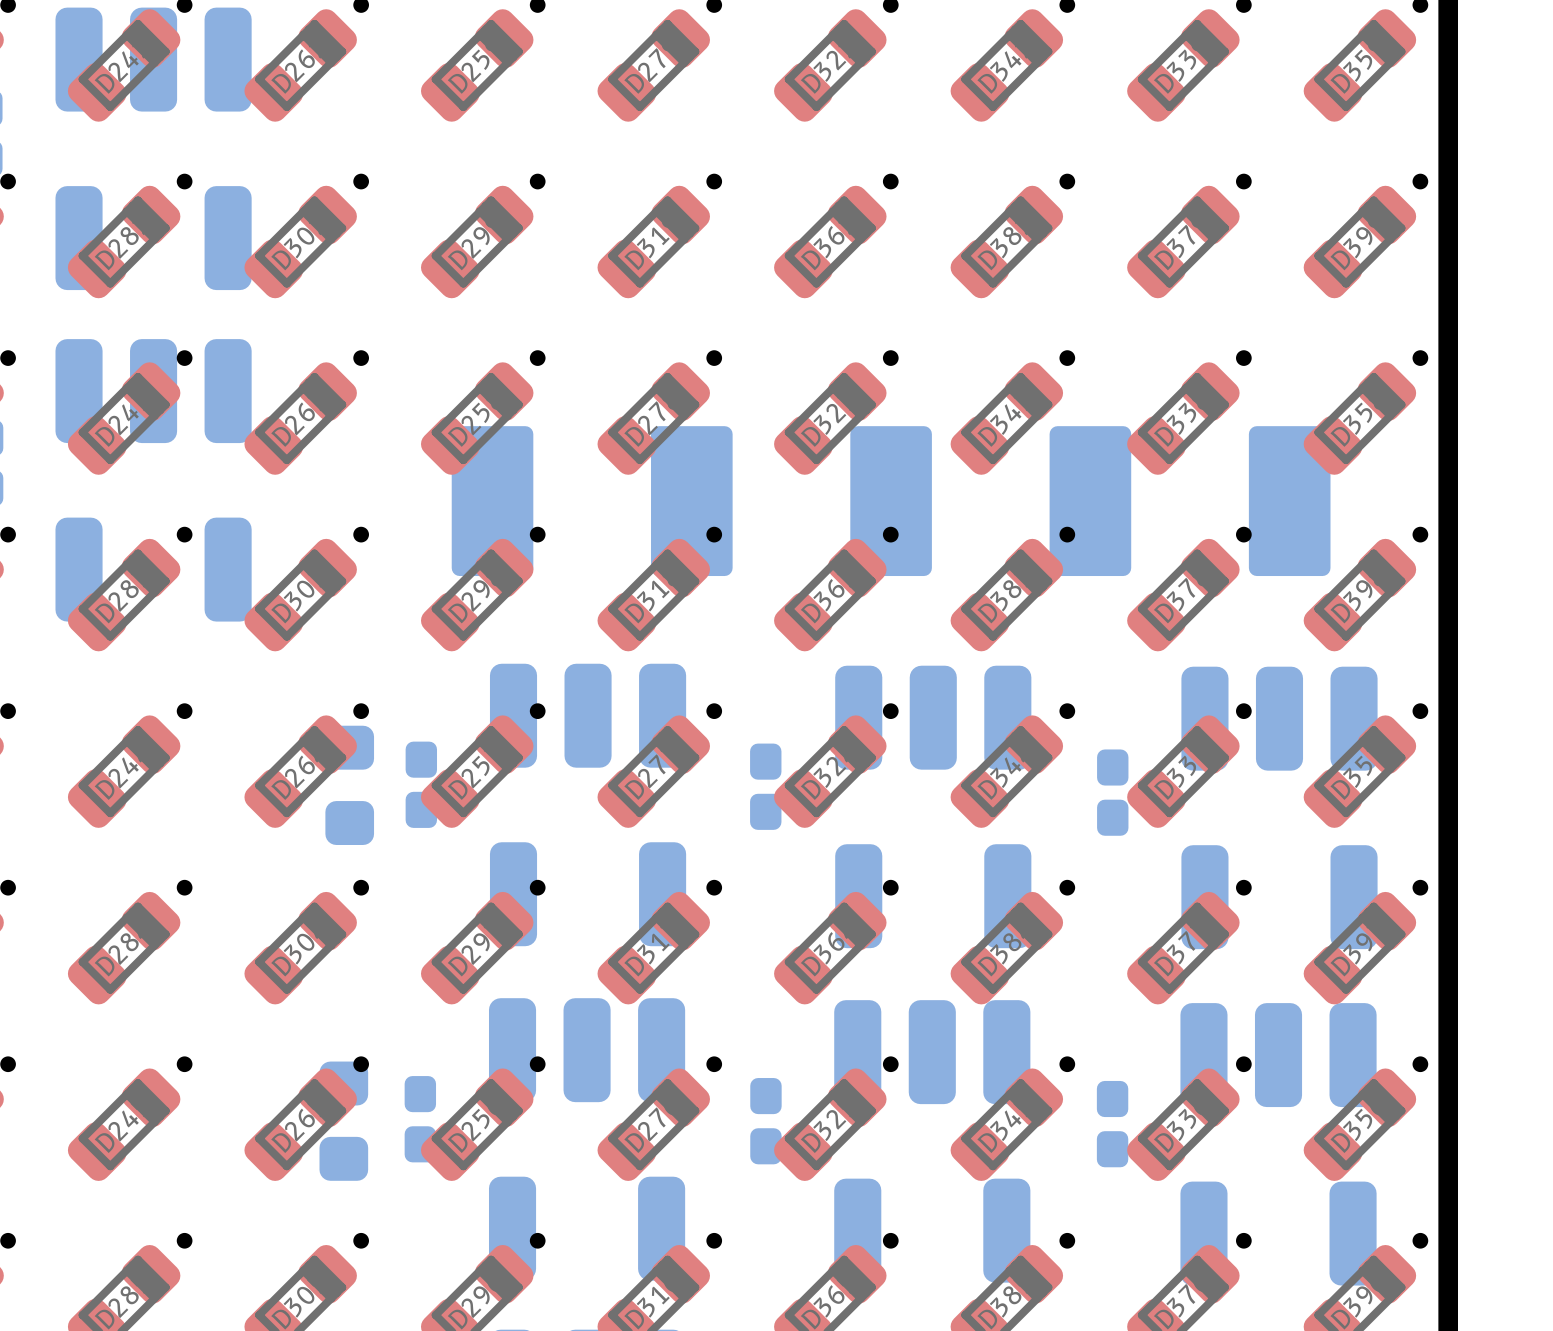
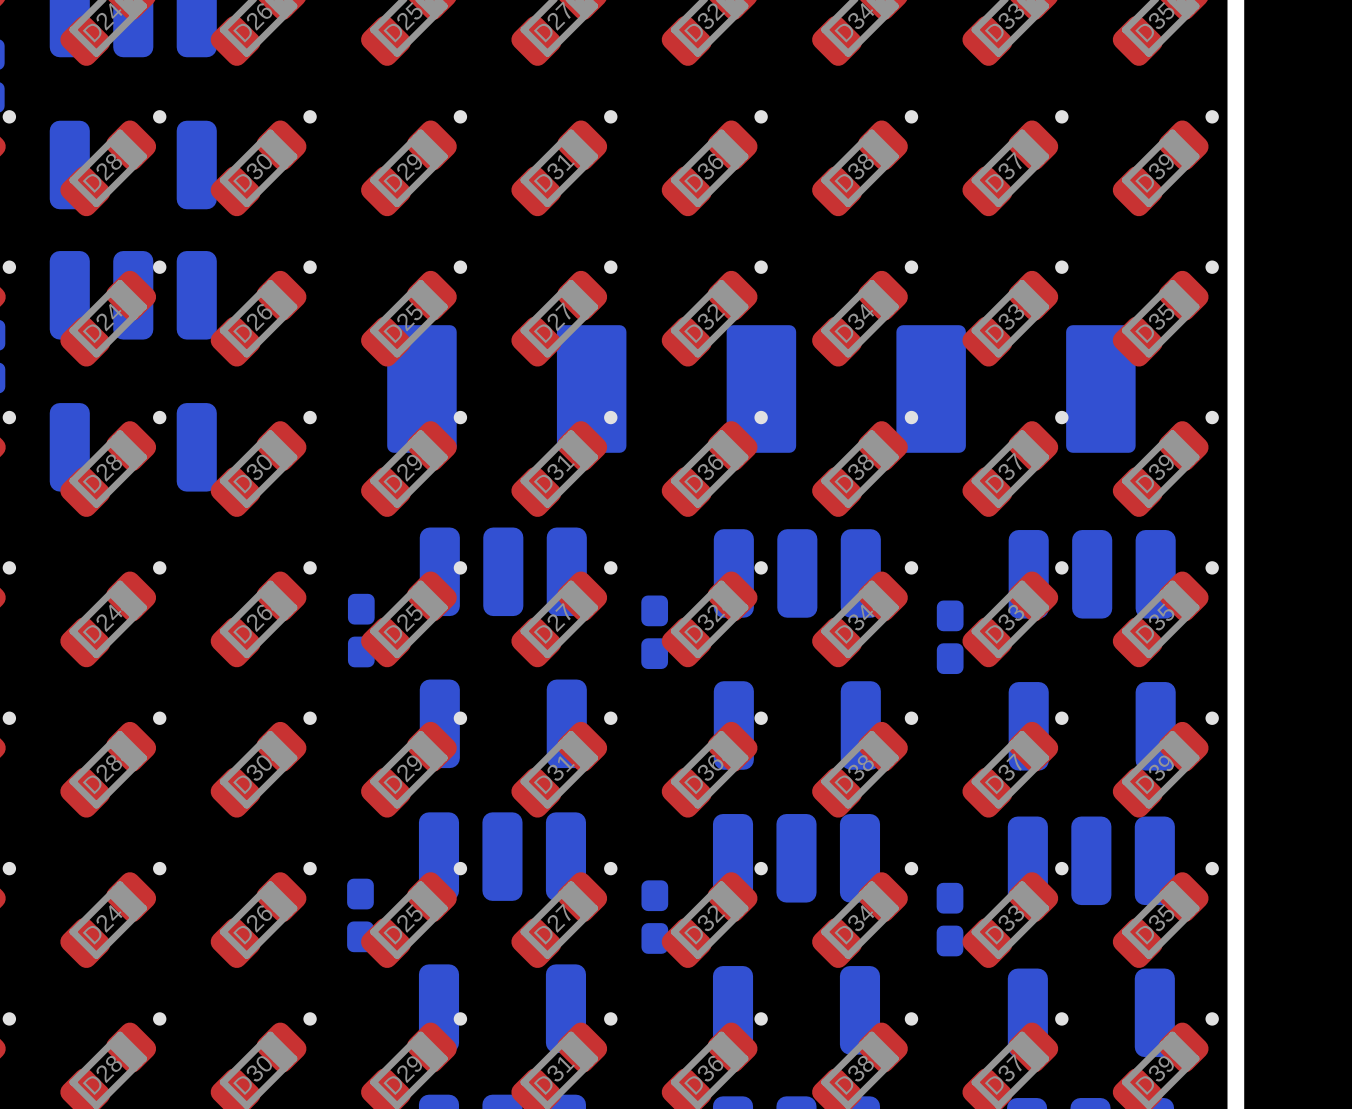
part: (349, 785) -> none
part: (343, 1121) -> none

